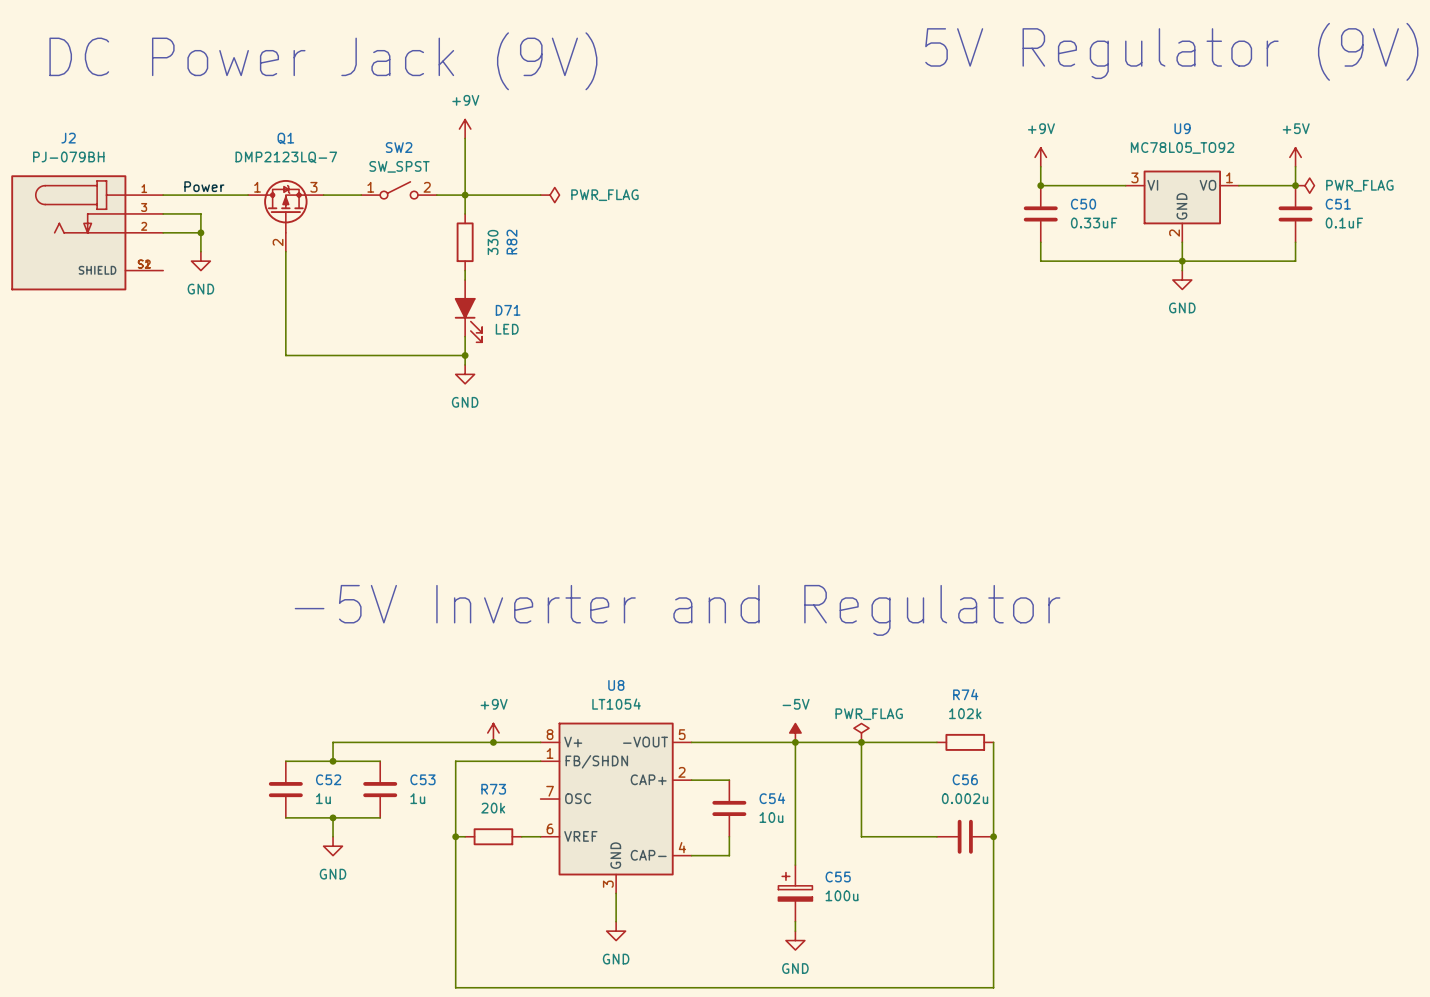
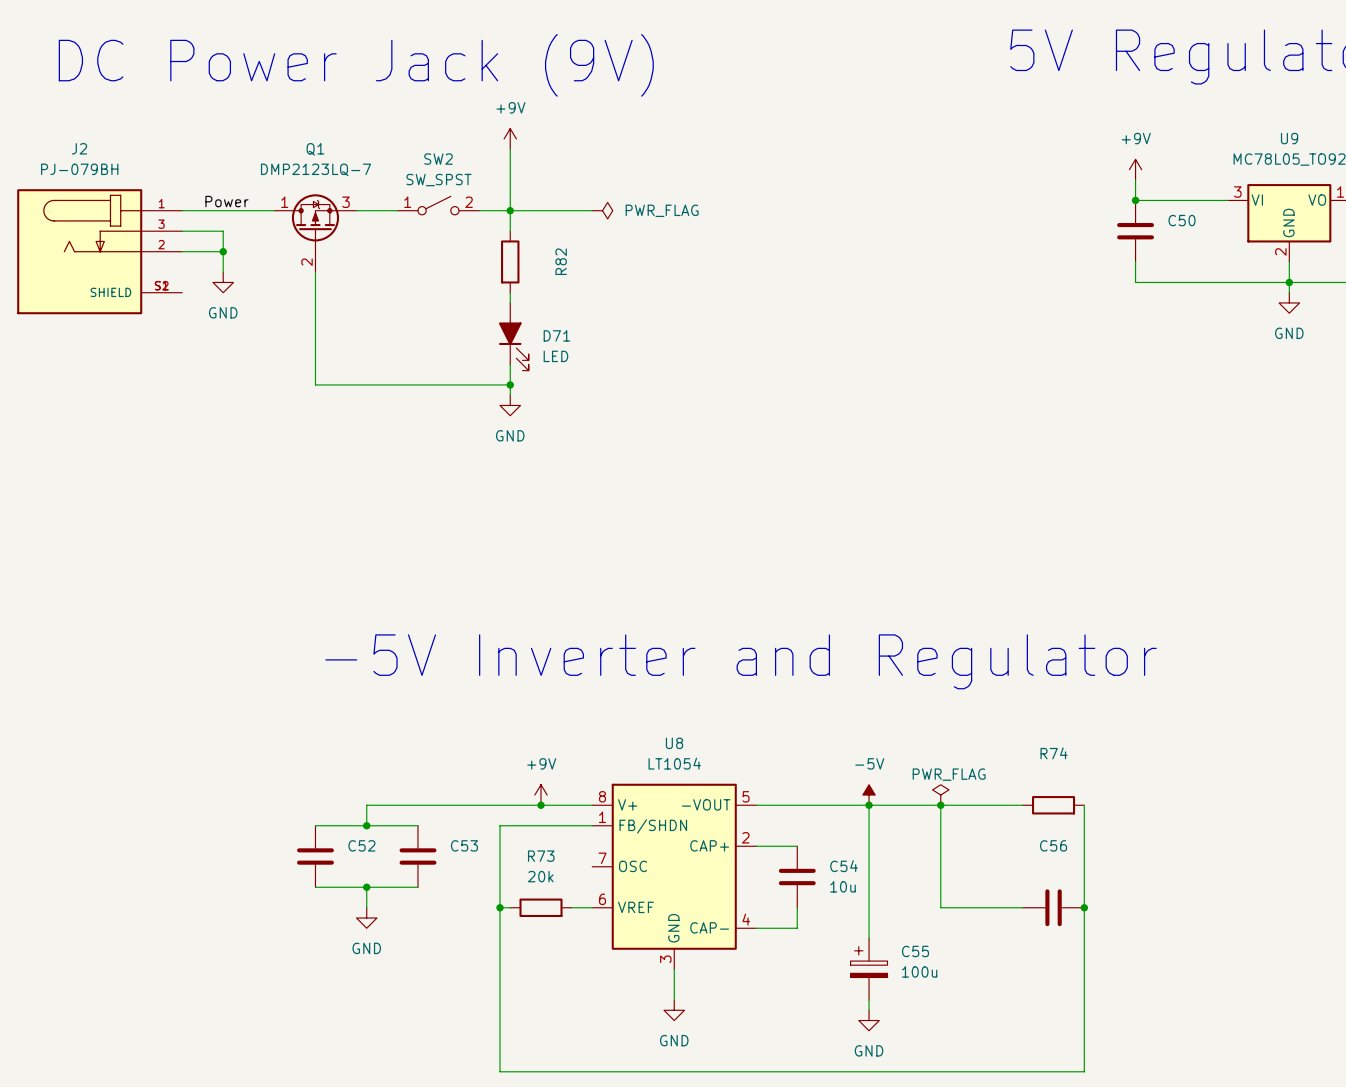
C50 value: 0.33uF (1094, 223) -> none
R82 value: 330 (493, 242) -> none
R74 value: 102k (965, 713) -> none
C52 value: 1u (323, 798) -> none
C53 value: 1u (417, 798) -> none
C56 value: 0.002u (965, 798) -> none

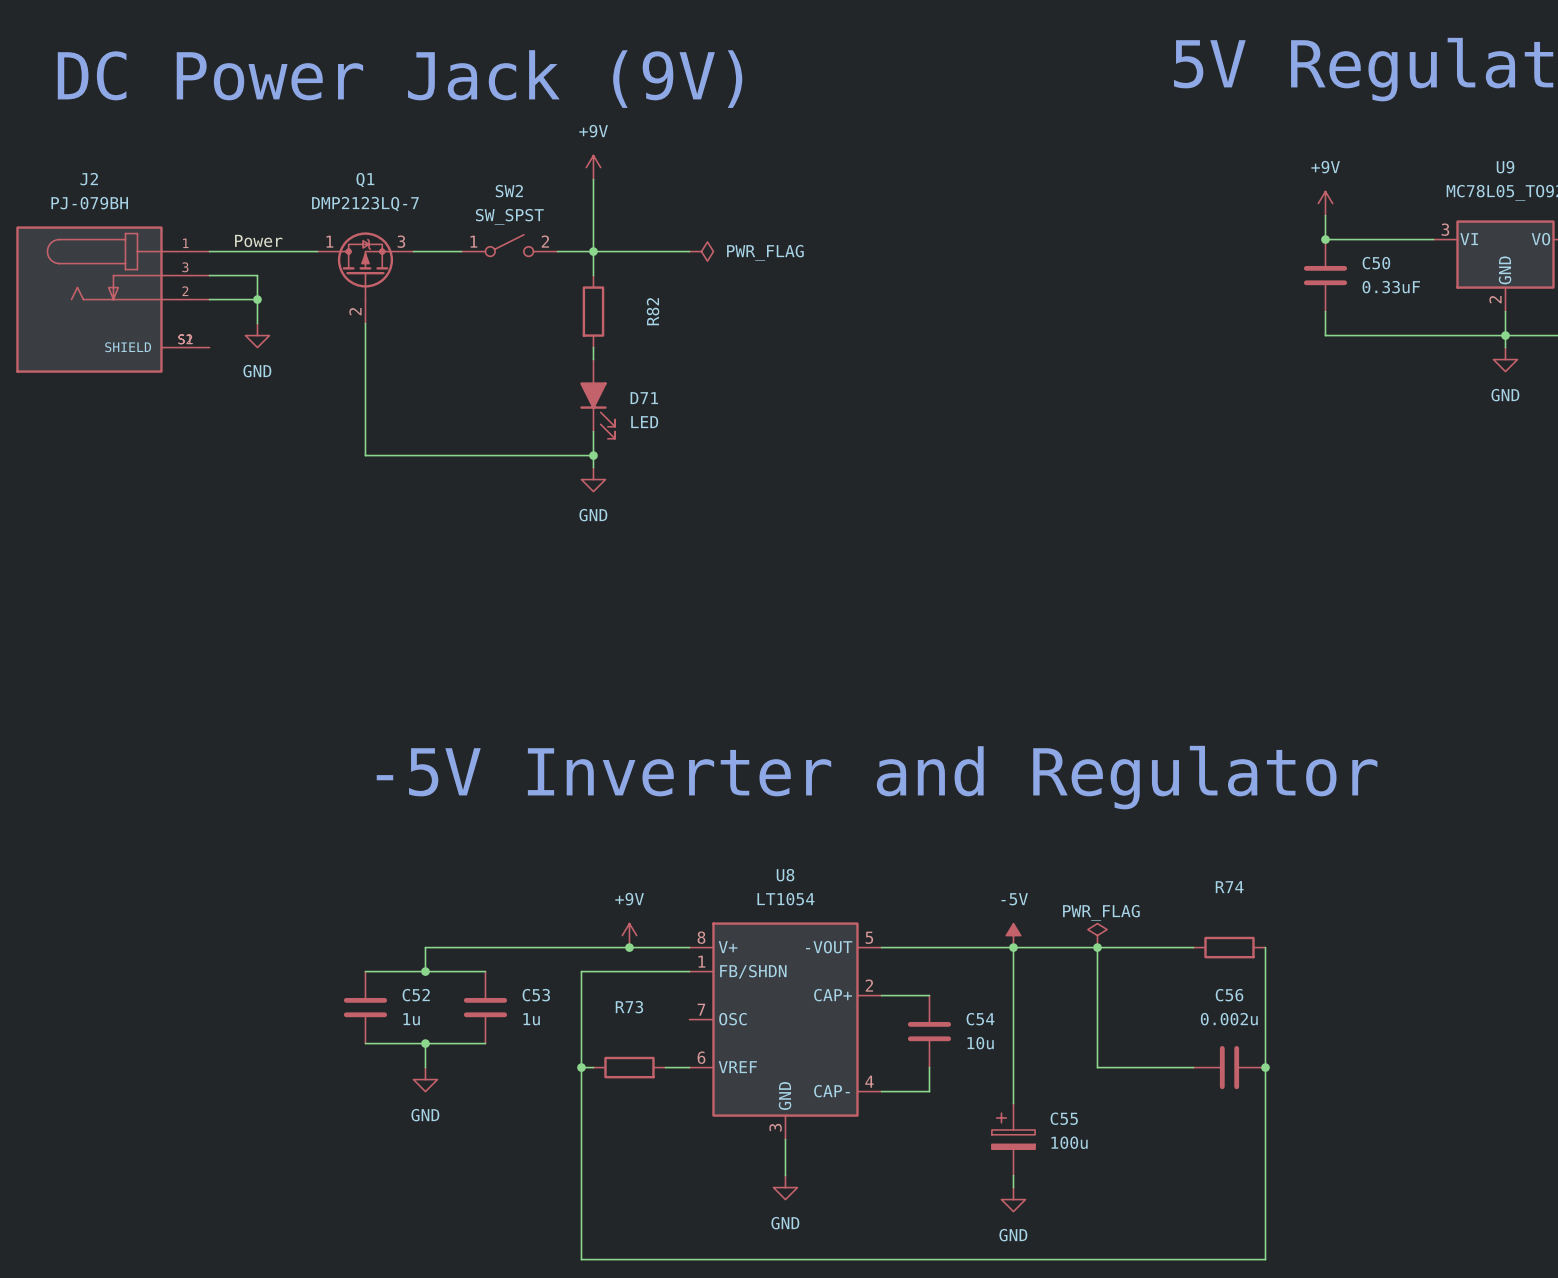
C50 value: none -> 0.33uF (1391, 287)
C52 value: none -> 1u (411, 1019)
C53 value: none -> 1u (531, 1019)
C56 value: none -> 0.002u (1229, 1019)
R73 value: 20k (540, 876) -> none

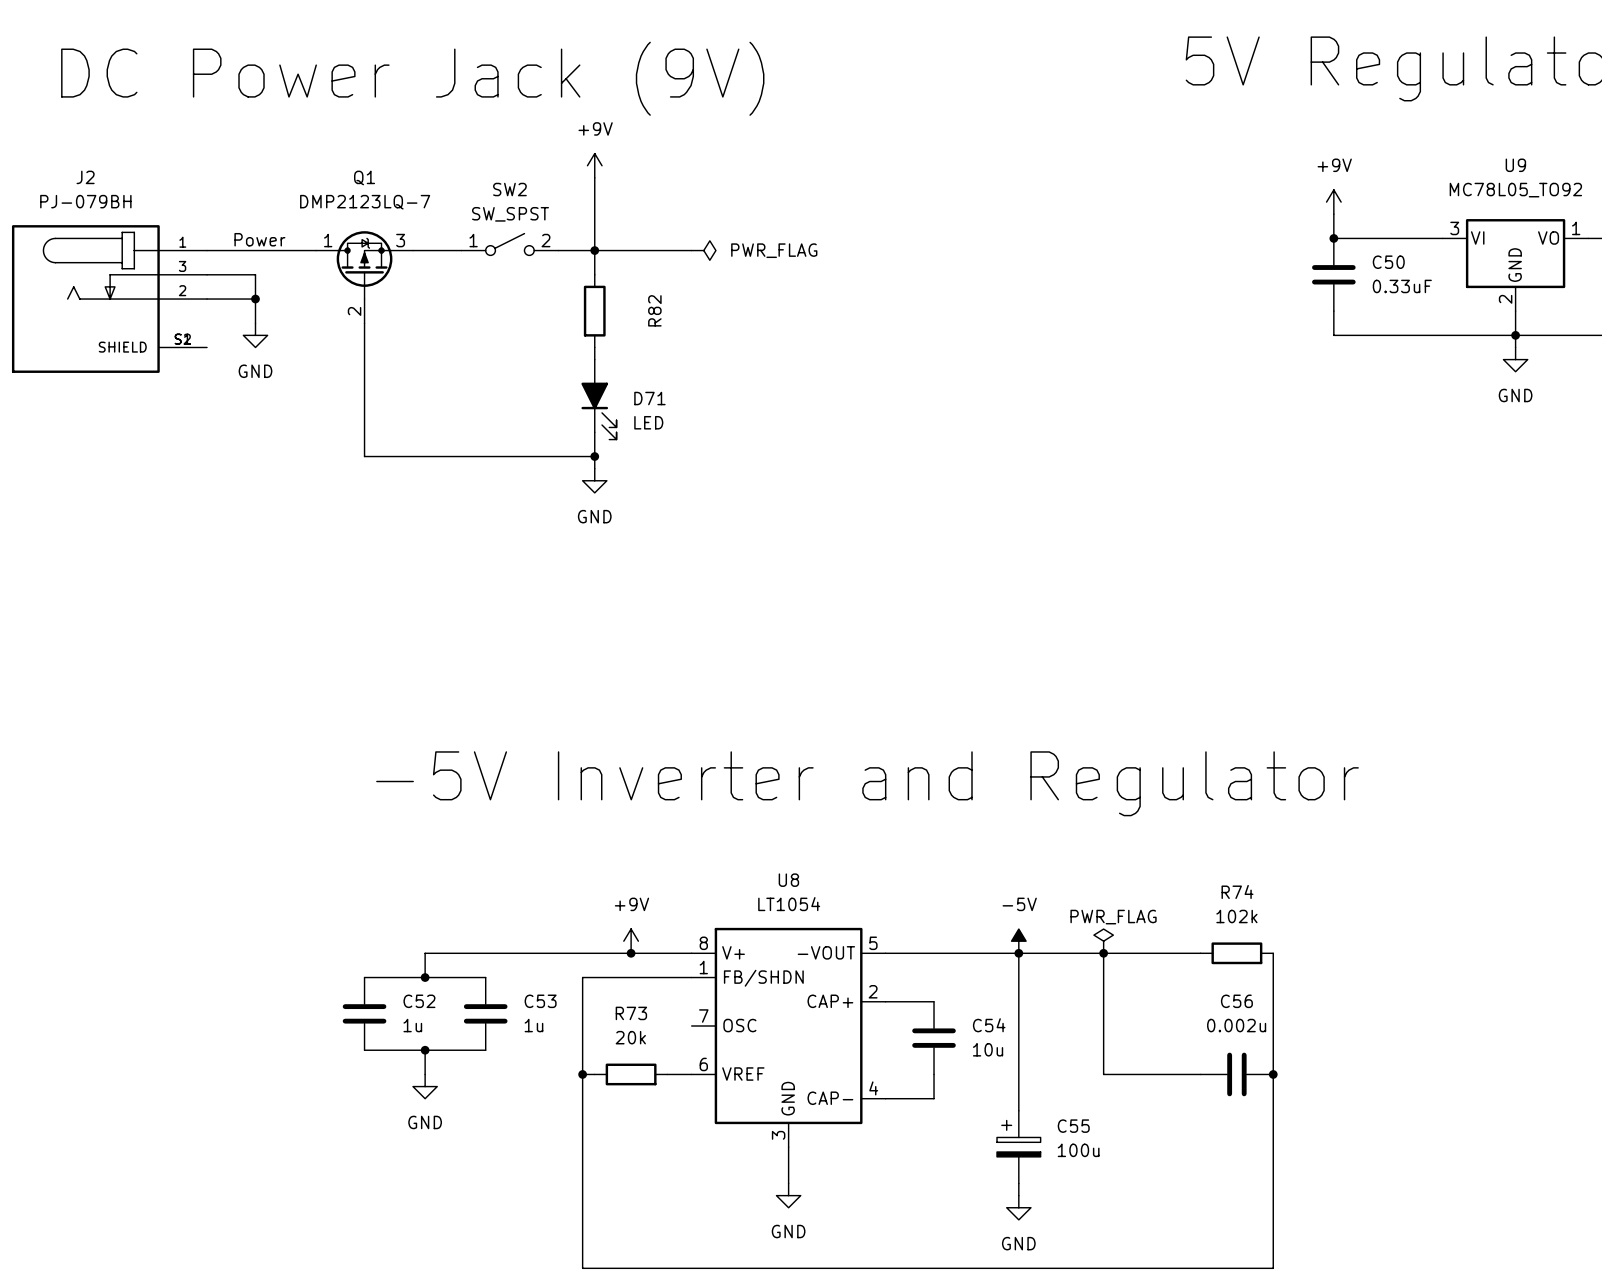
R74 value: none -> 102k (1236, 916)
R73 value: none -> 20k (630, 1037)

